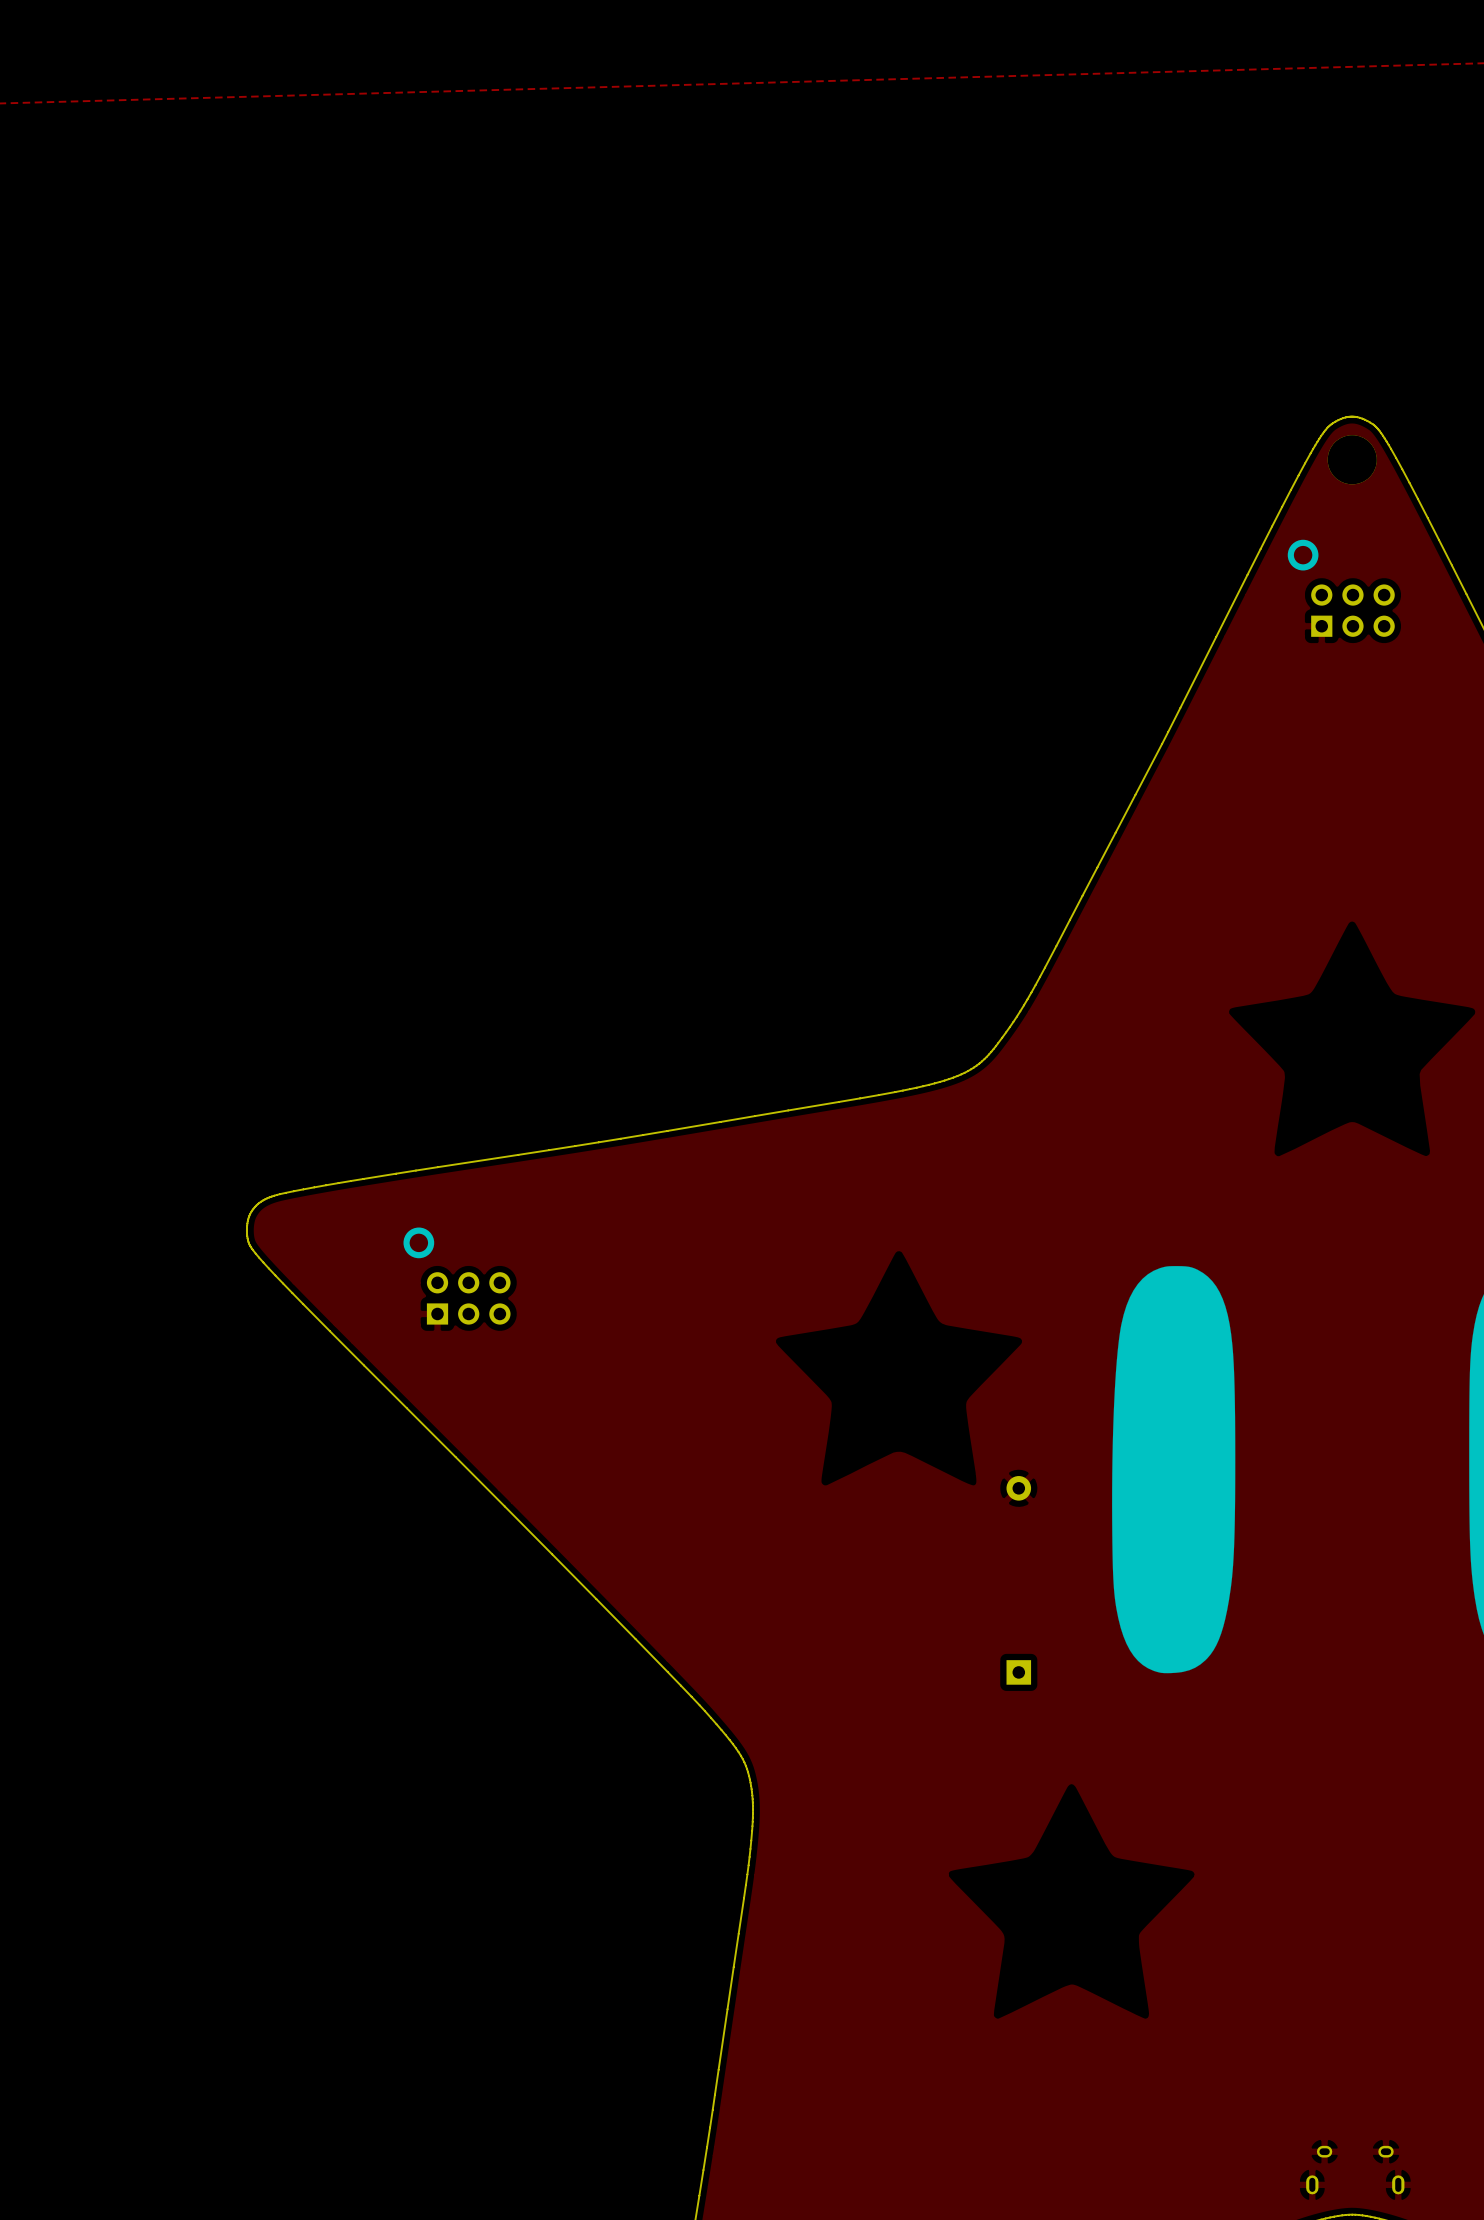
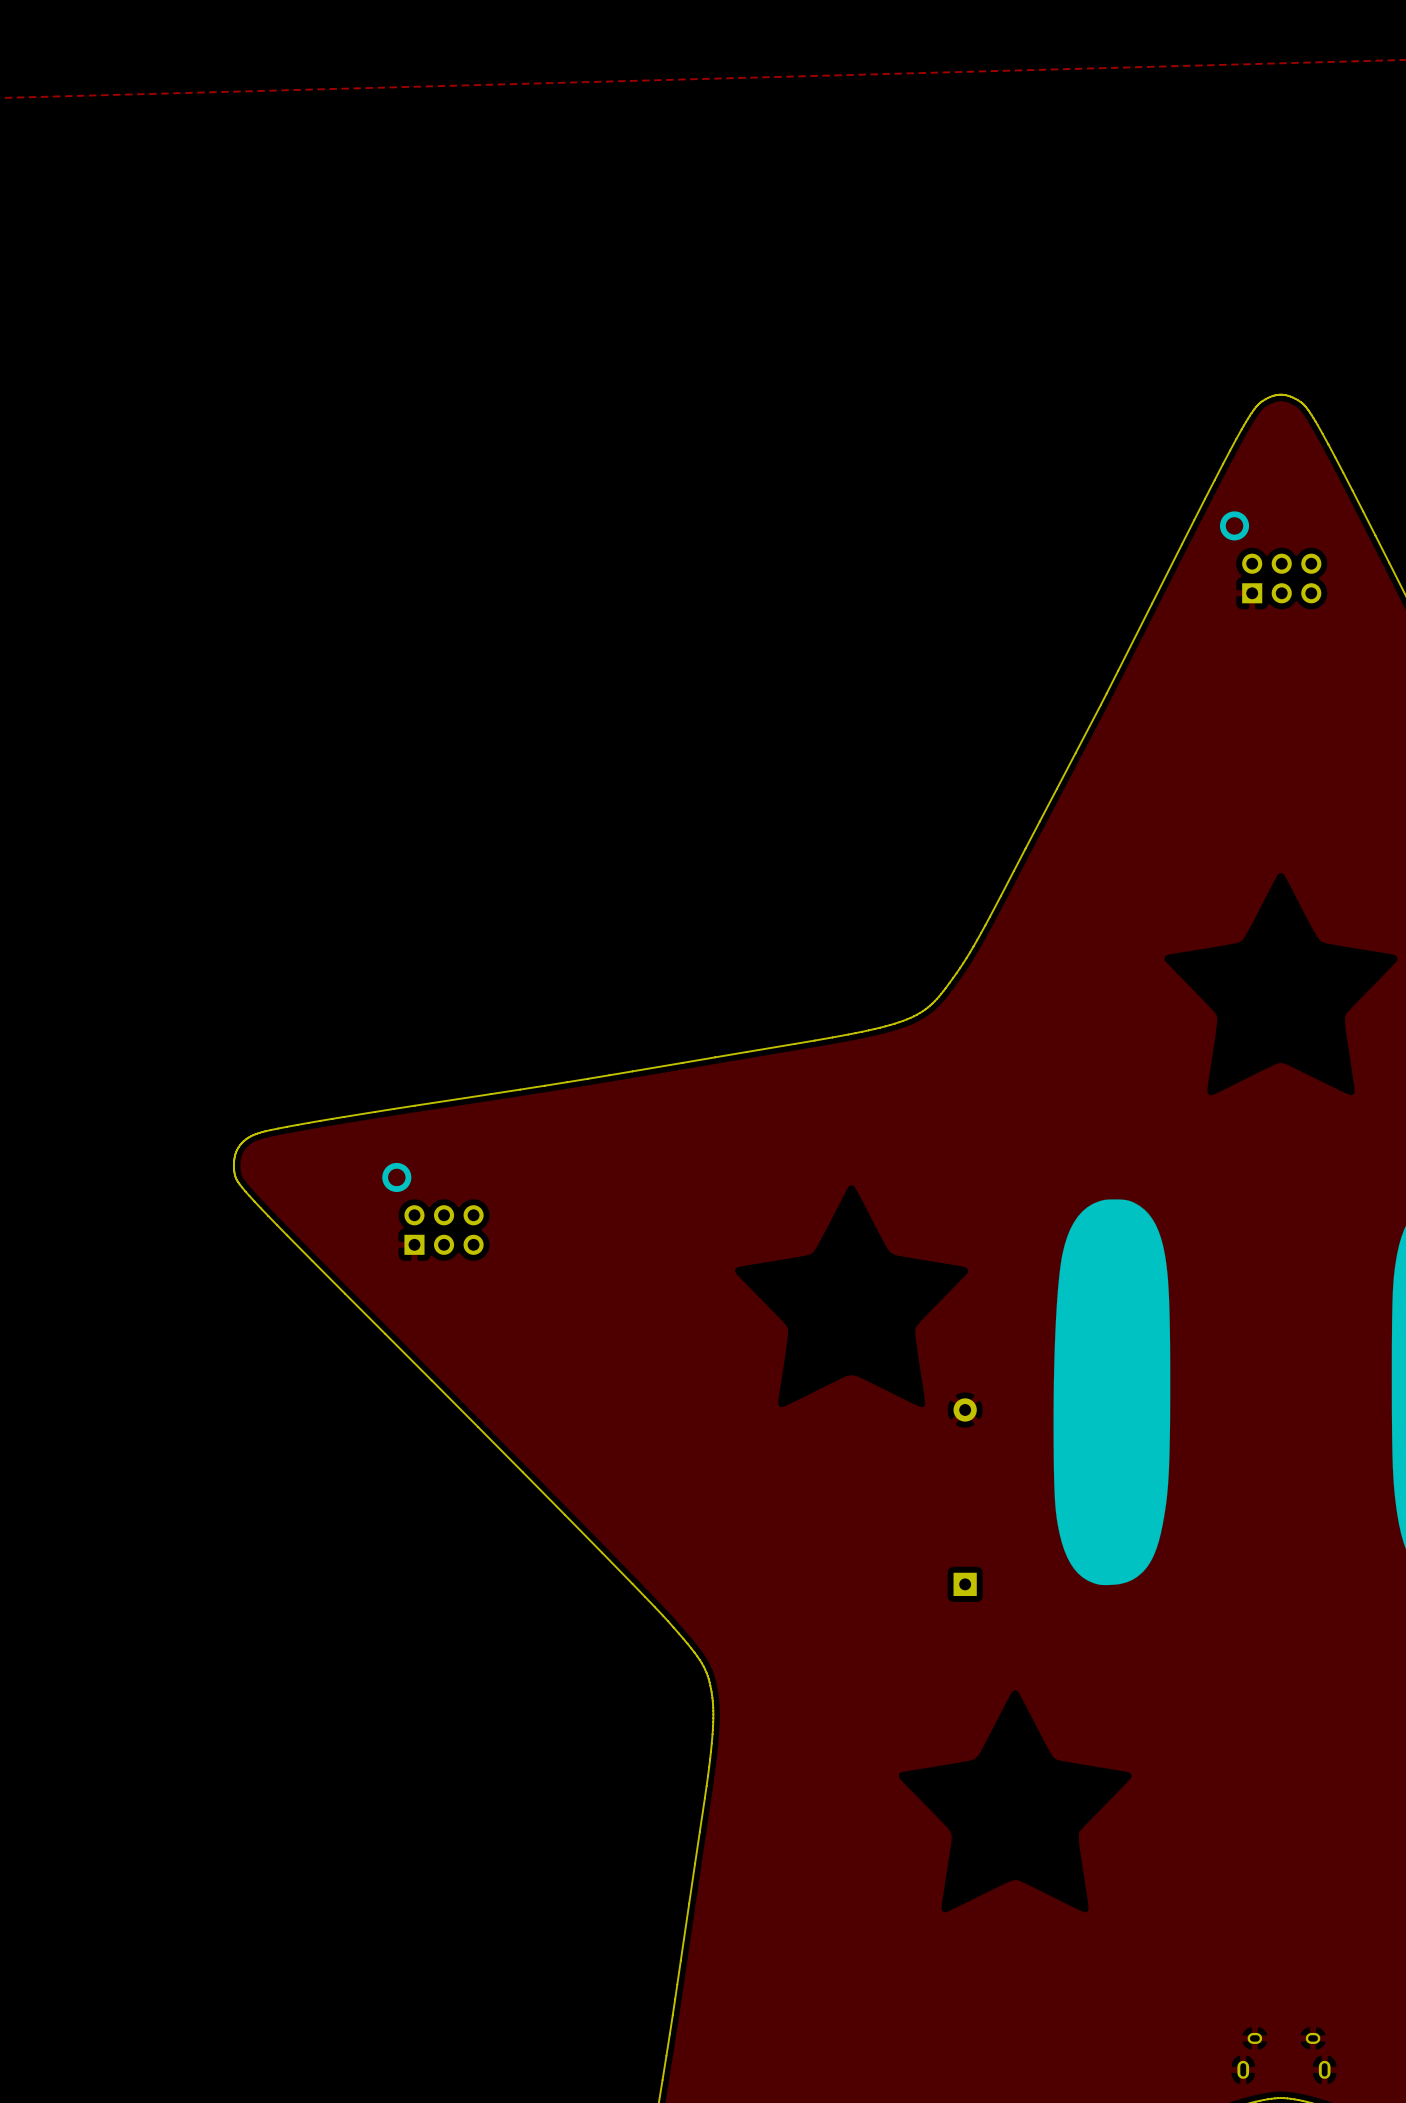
part: (1352, 459) -> none

